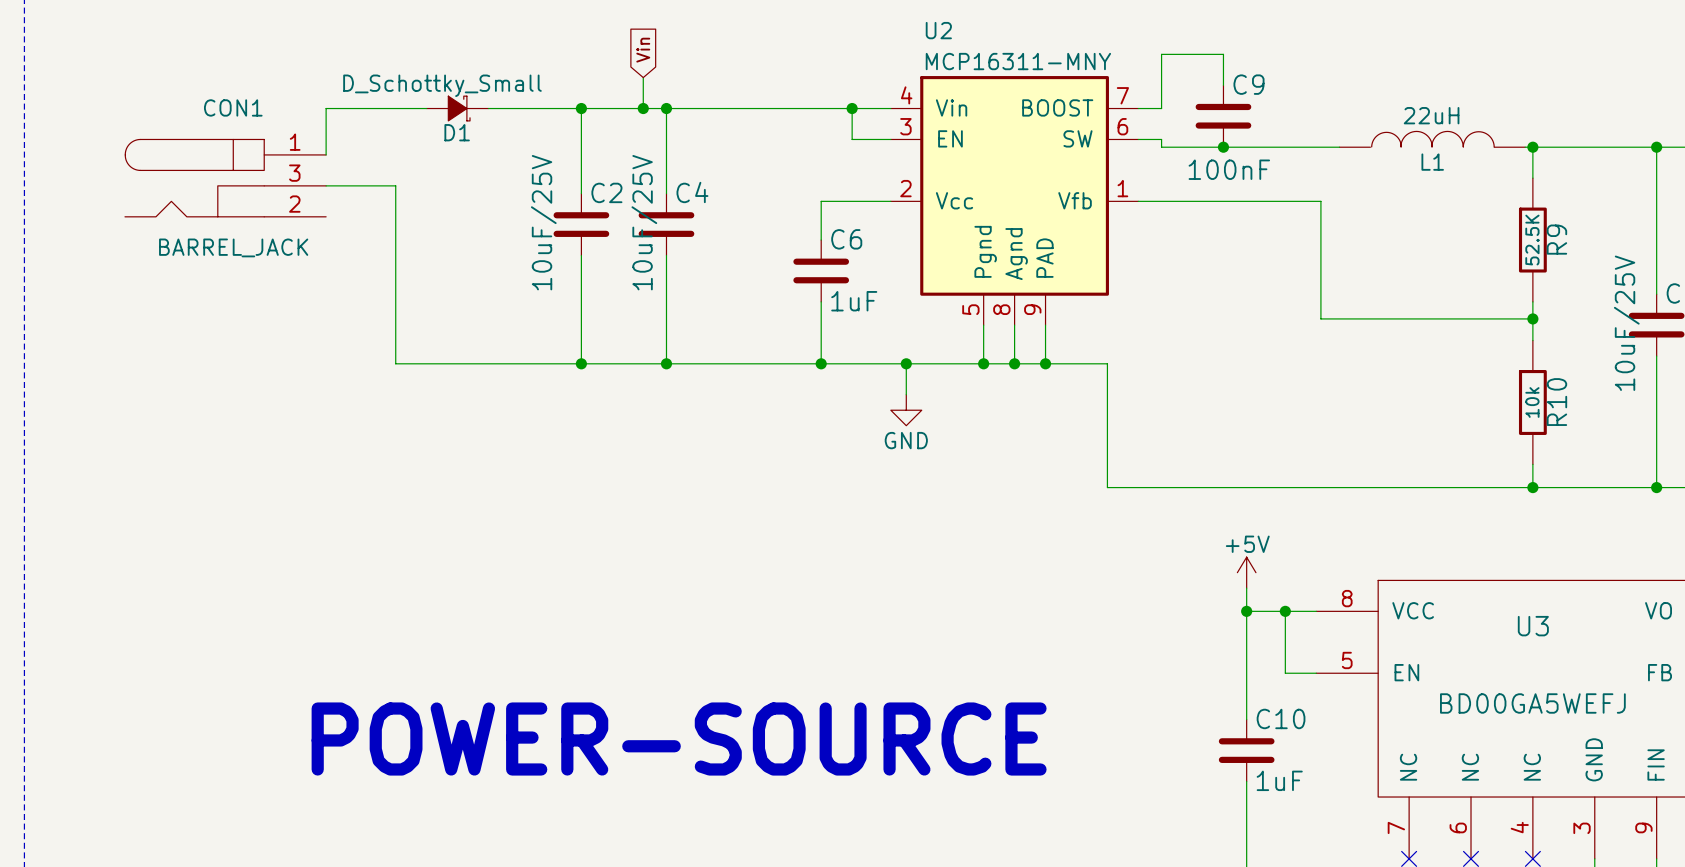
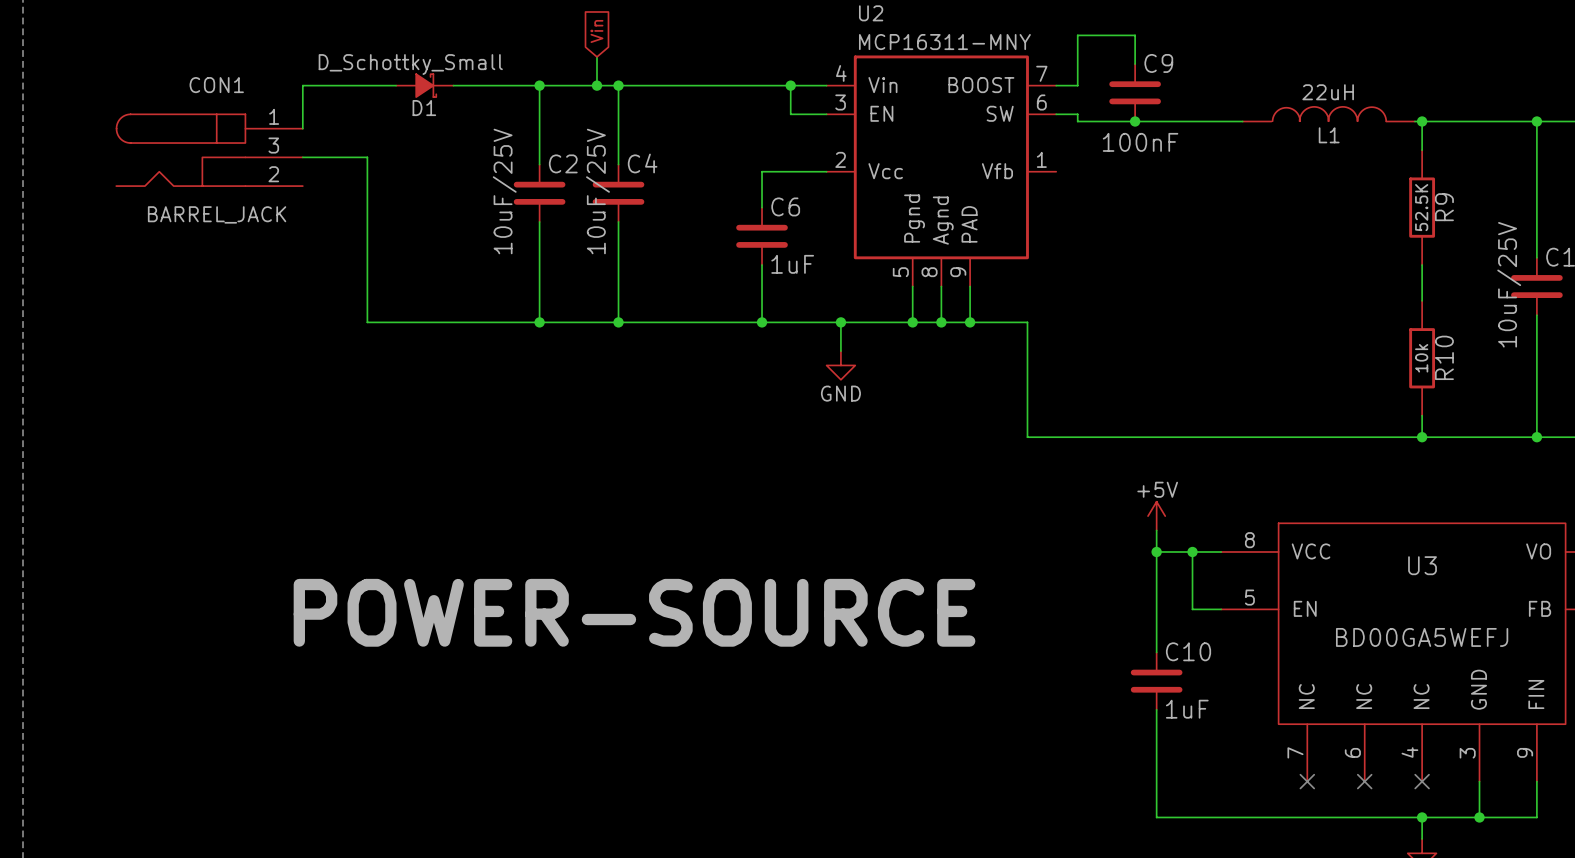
wire: (1138, 201) (1320, 201) (1320, 318) (1532, 318) -> none
junction: (1532, 318) -> none
label: none -> POWER-SOURCE (634, 612)
text: POWER-SOURCE (679, 739) -> none

